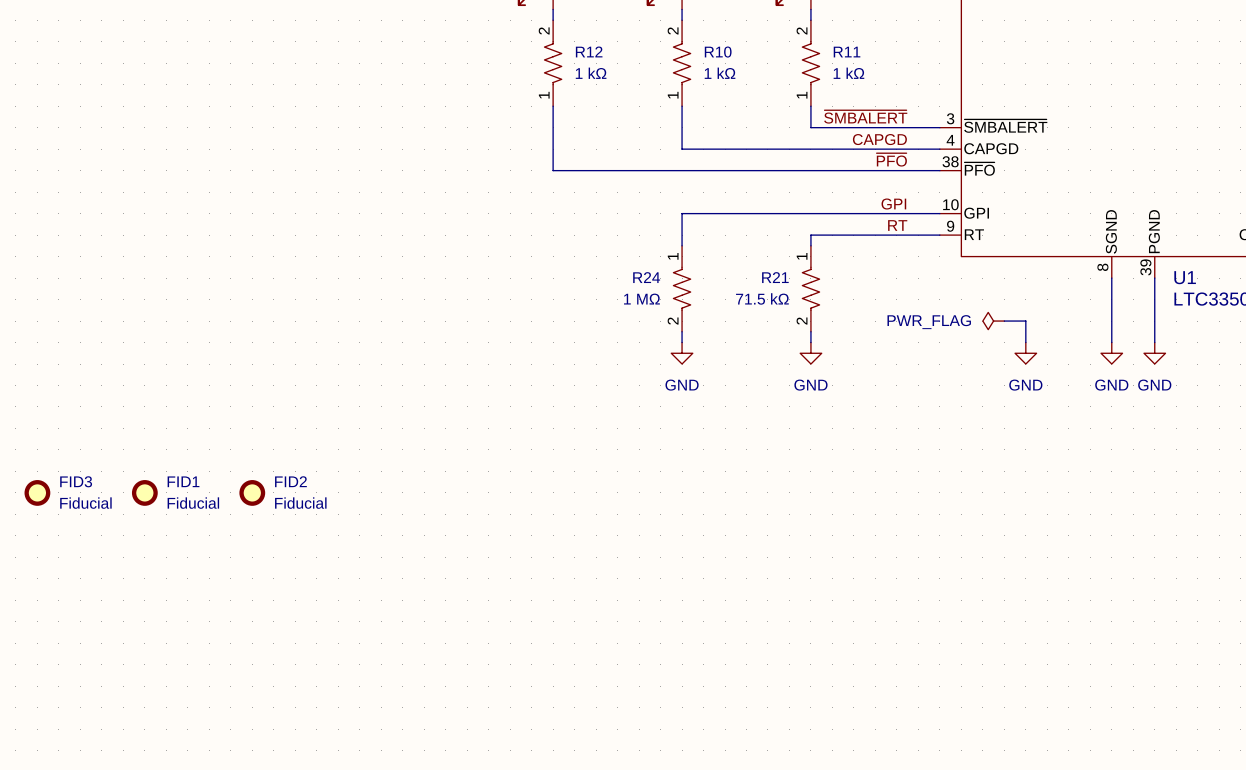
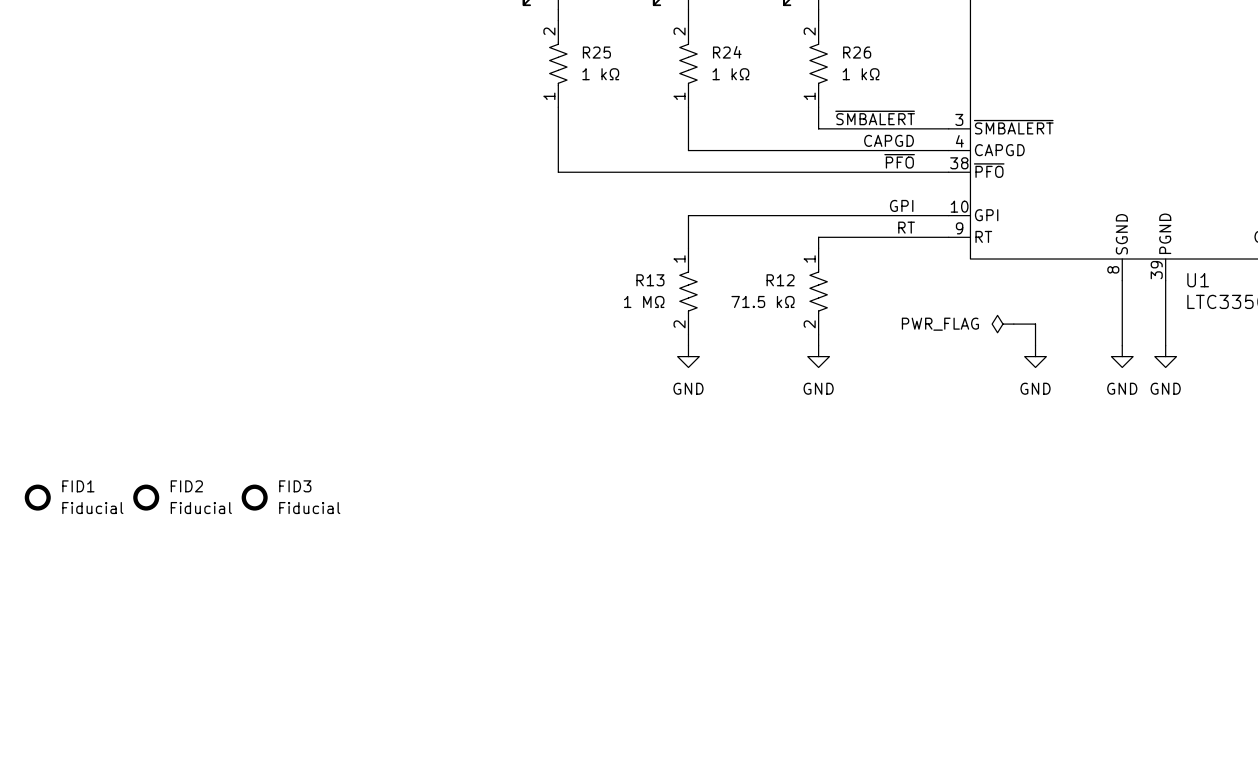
R12 name: R12 (589, 51) -> R25 (596, 52)
R10 name: R10 (718, 52) -> R24 (727, 52)
R11 name: R11 (847, 52) -> R26 (857, 52)
R24 name: R24 (646, 277) -> R13 (650, 280)
R21 name: R21 (775, 277) -> R12 (780, 280)
FID3 name: FID3 (76, 481) -> FID1 (78, 486)
FID1 name: FID1 (183, 481) -> FID2 (186, 486)
FID2 name: FID2 (290, 481) -> FID3 (295, 486)

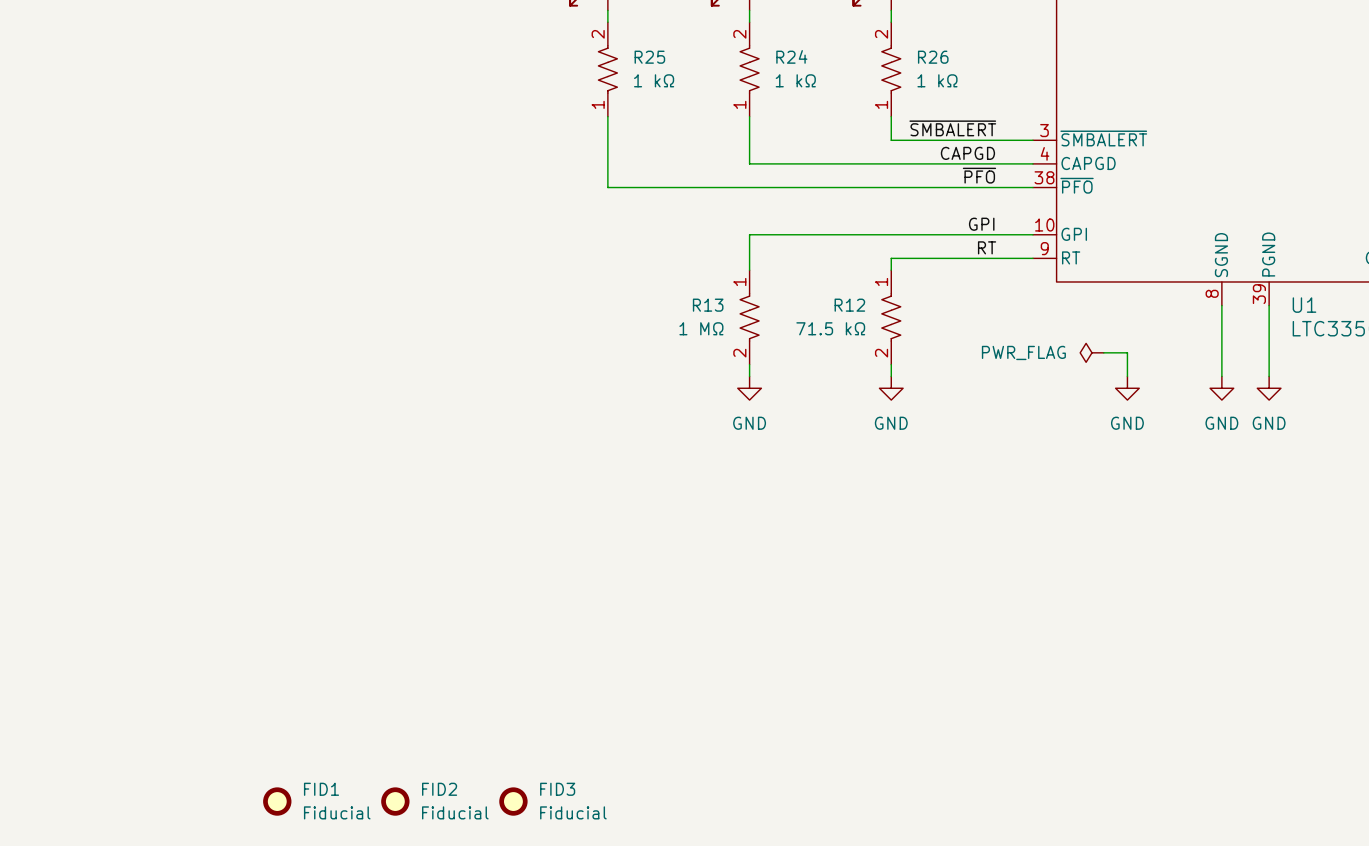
FID1 position: (37, 497) -> (277, 801)
FID2 position: (146, 497) -> (395, 801)
FID3 position: (254, 497) -> (513, 801)

